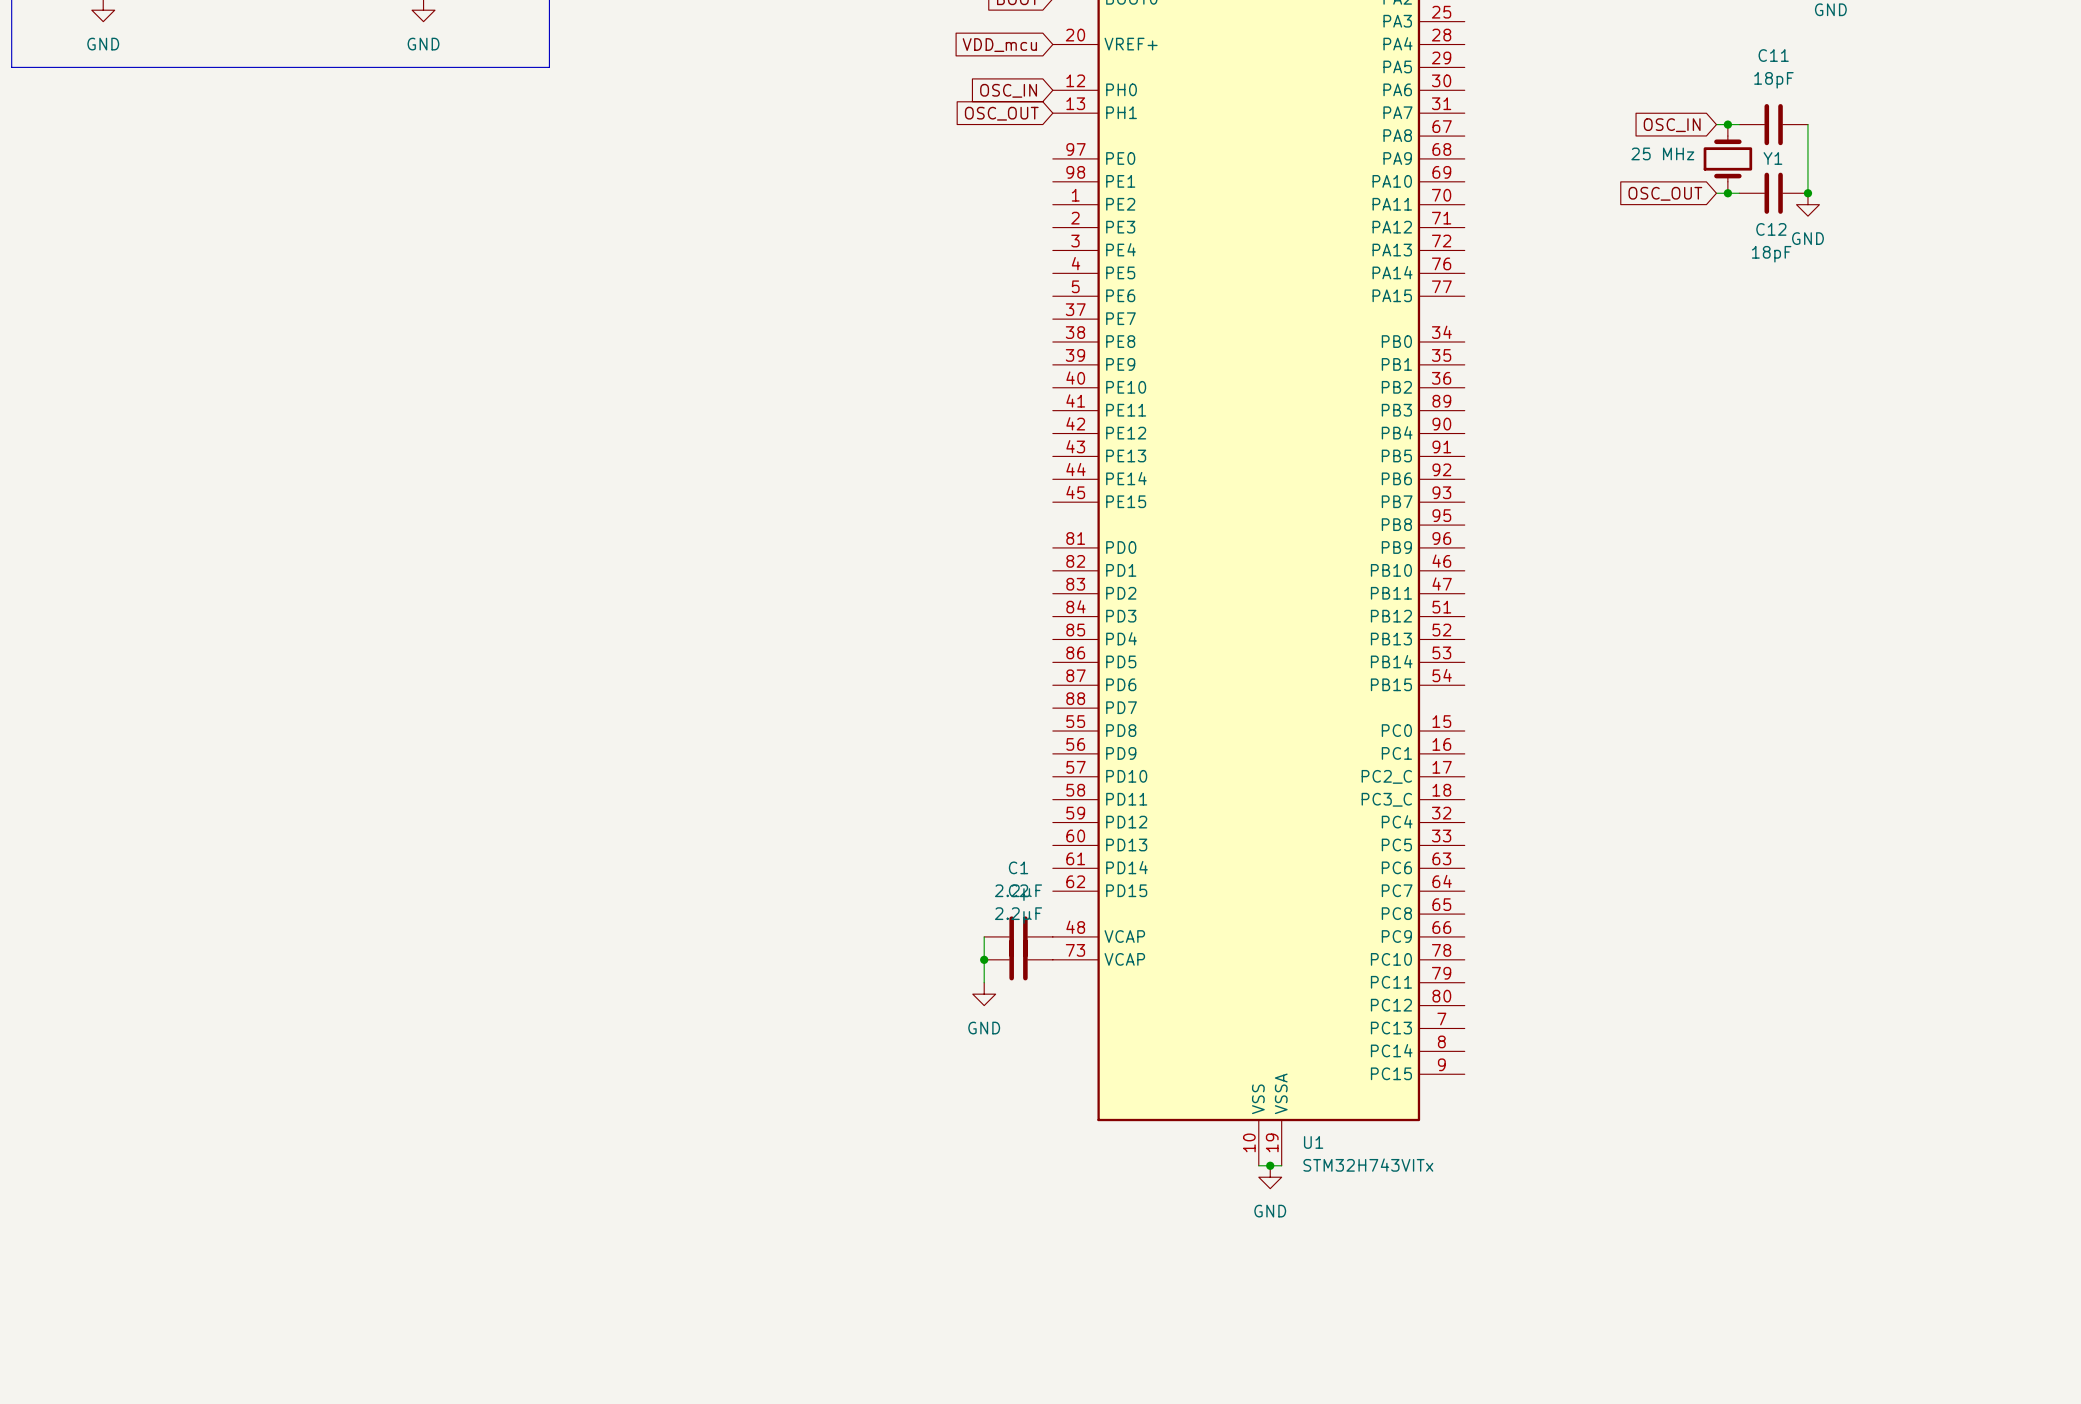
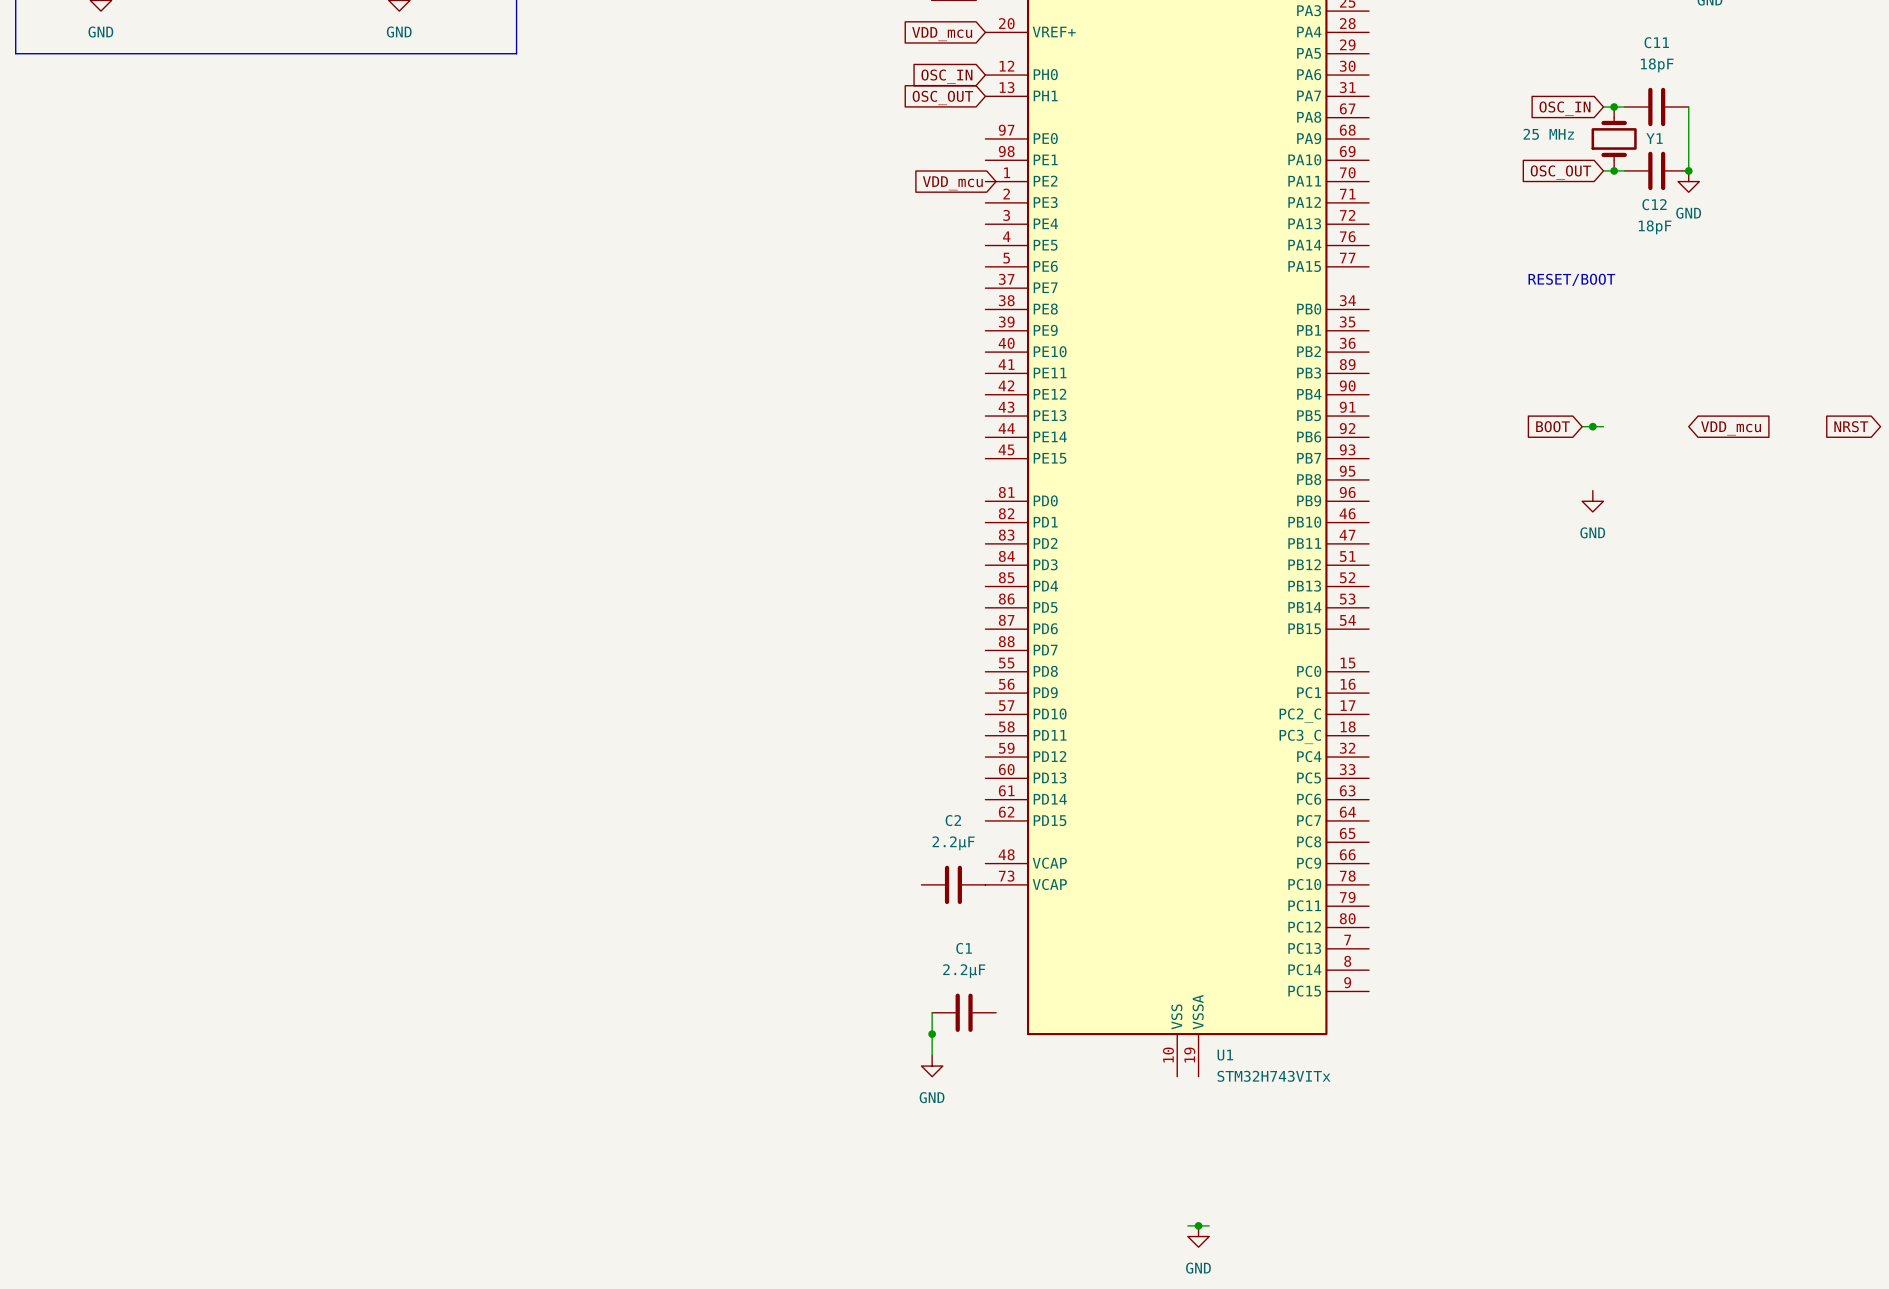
global label: none -> VDD_mcu (952, 183)
text: none -> RESET/BOOT (1571, 279)
global label: none -> BOOT (1553, 426)
wire: none -> (1582, 426) (1603, 426)
junction: none -> (1592, 426)
global label: none -> NRST (1851, 426)
global label: none -> VDD_mcu (1731, 428)
power symbol: none -> GND (1592, 501)
wire: (984, 936) (984, 982) -> (932, 1012) (932, 1055)
C1 position: (1018, 936) -> (964, 1012)
junction: (984, 959) -> none
power symbol: GND (984, 994) -> none
junction: none -> (932, 1034)
power symbol: none -> GND (932, 1066)
wire: (1258, 1165) (1281, 1165) -> (1187, 1225) (1209, 1225)
junction: (1270, 1165) -> none
power symbol: GND (1270, 1177) -> none
junction: none -> (1198, 1225)
power symbol: none -> GND (1198, 1236)

